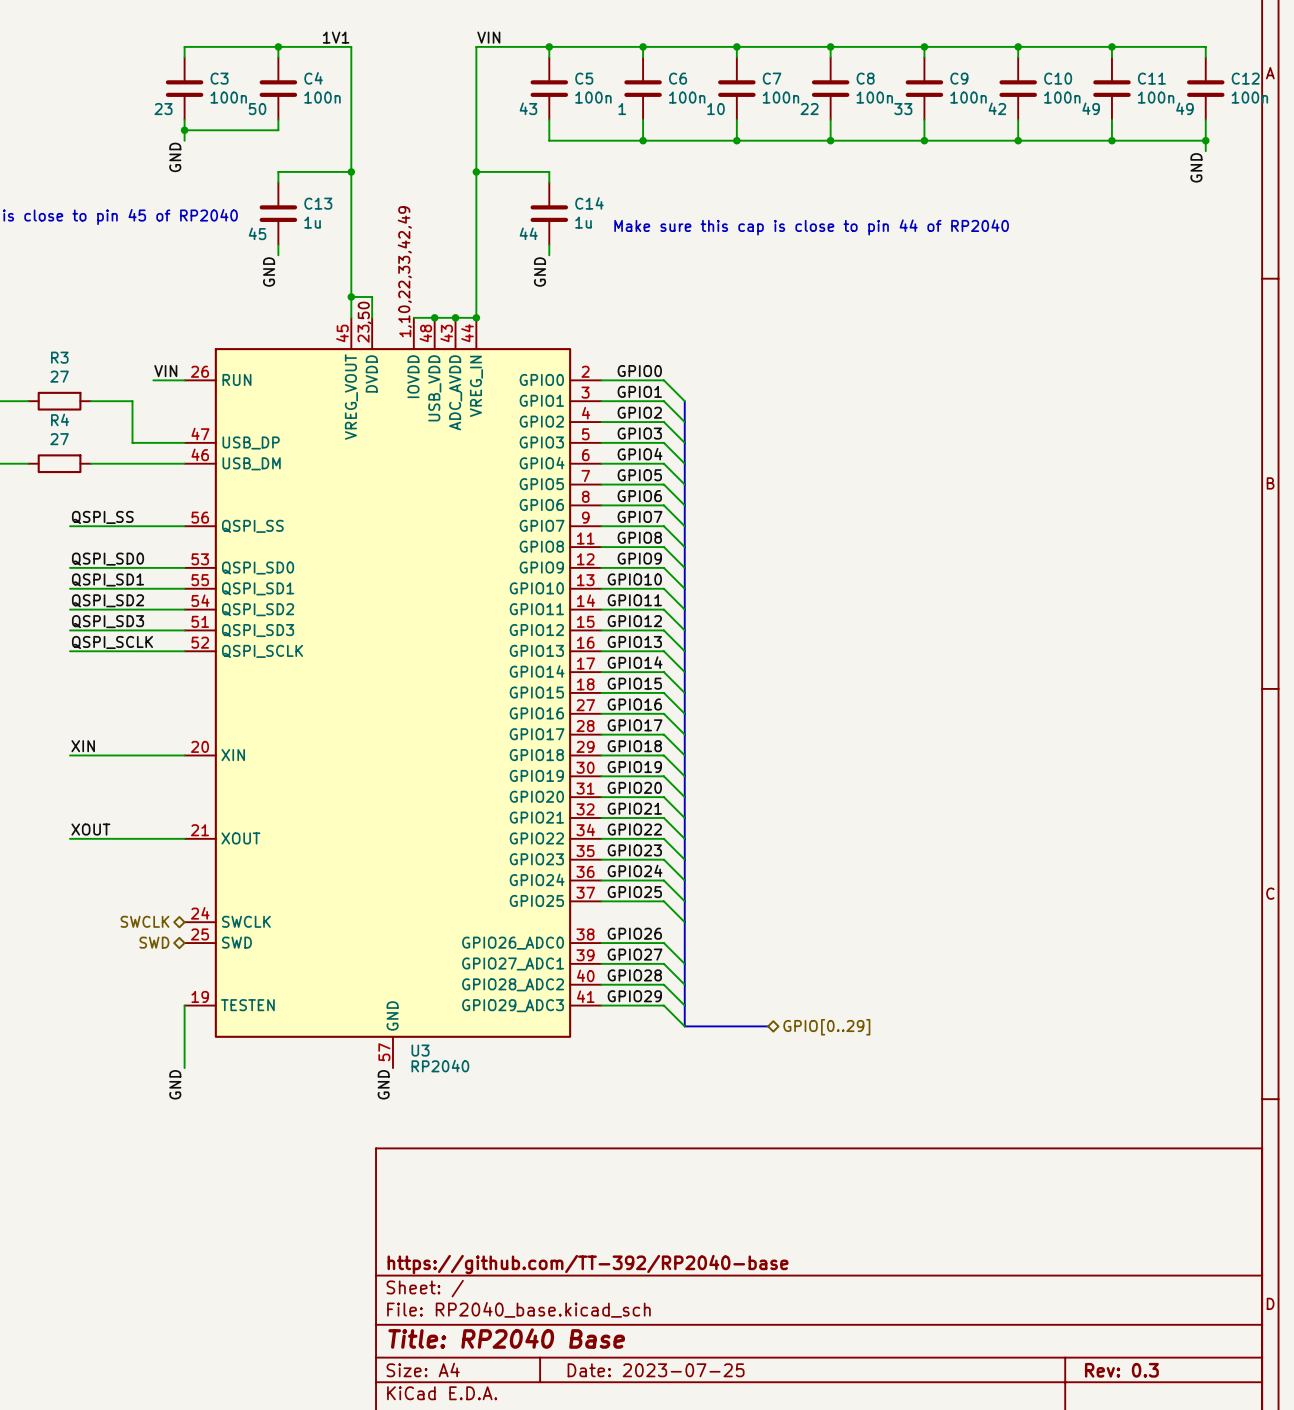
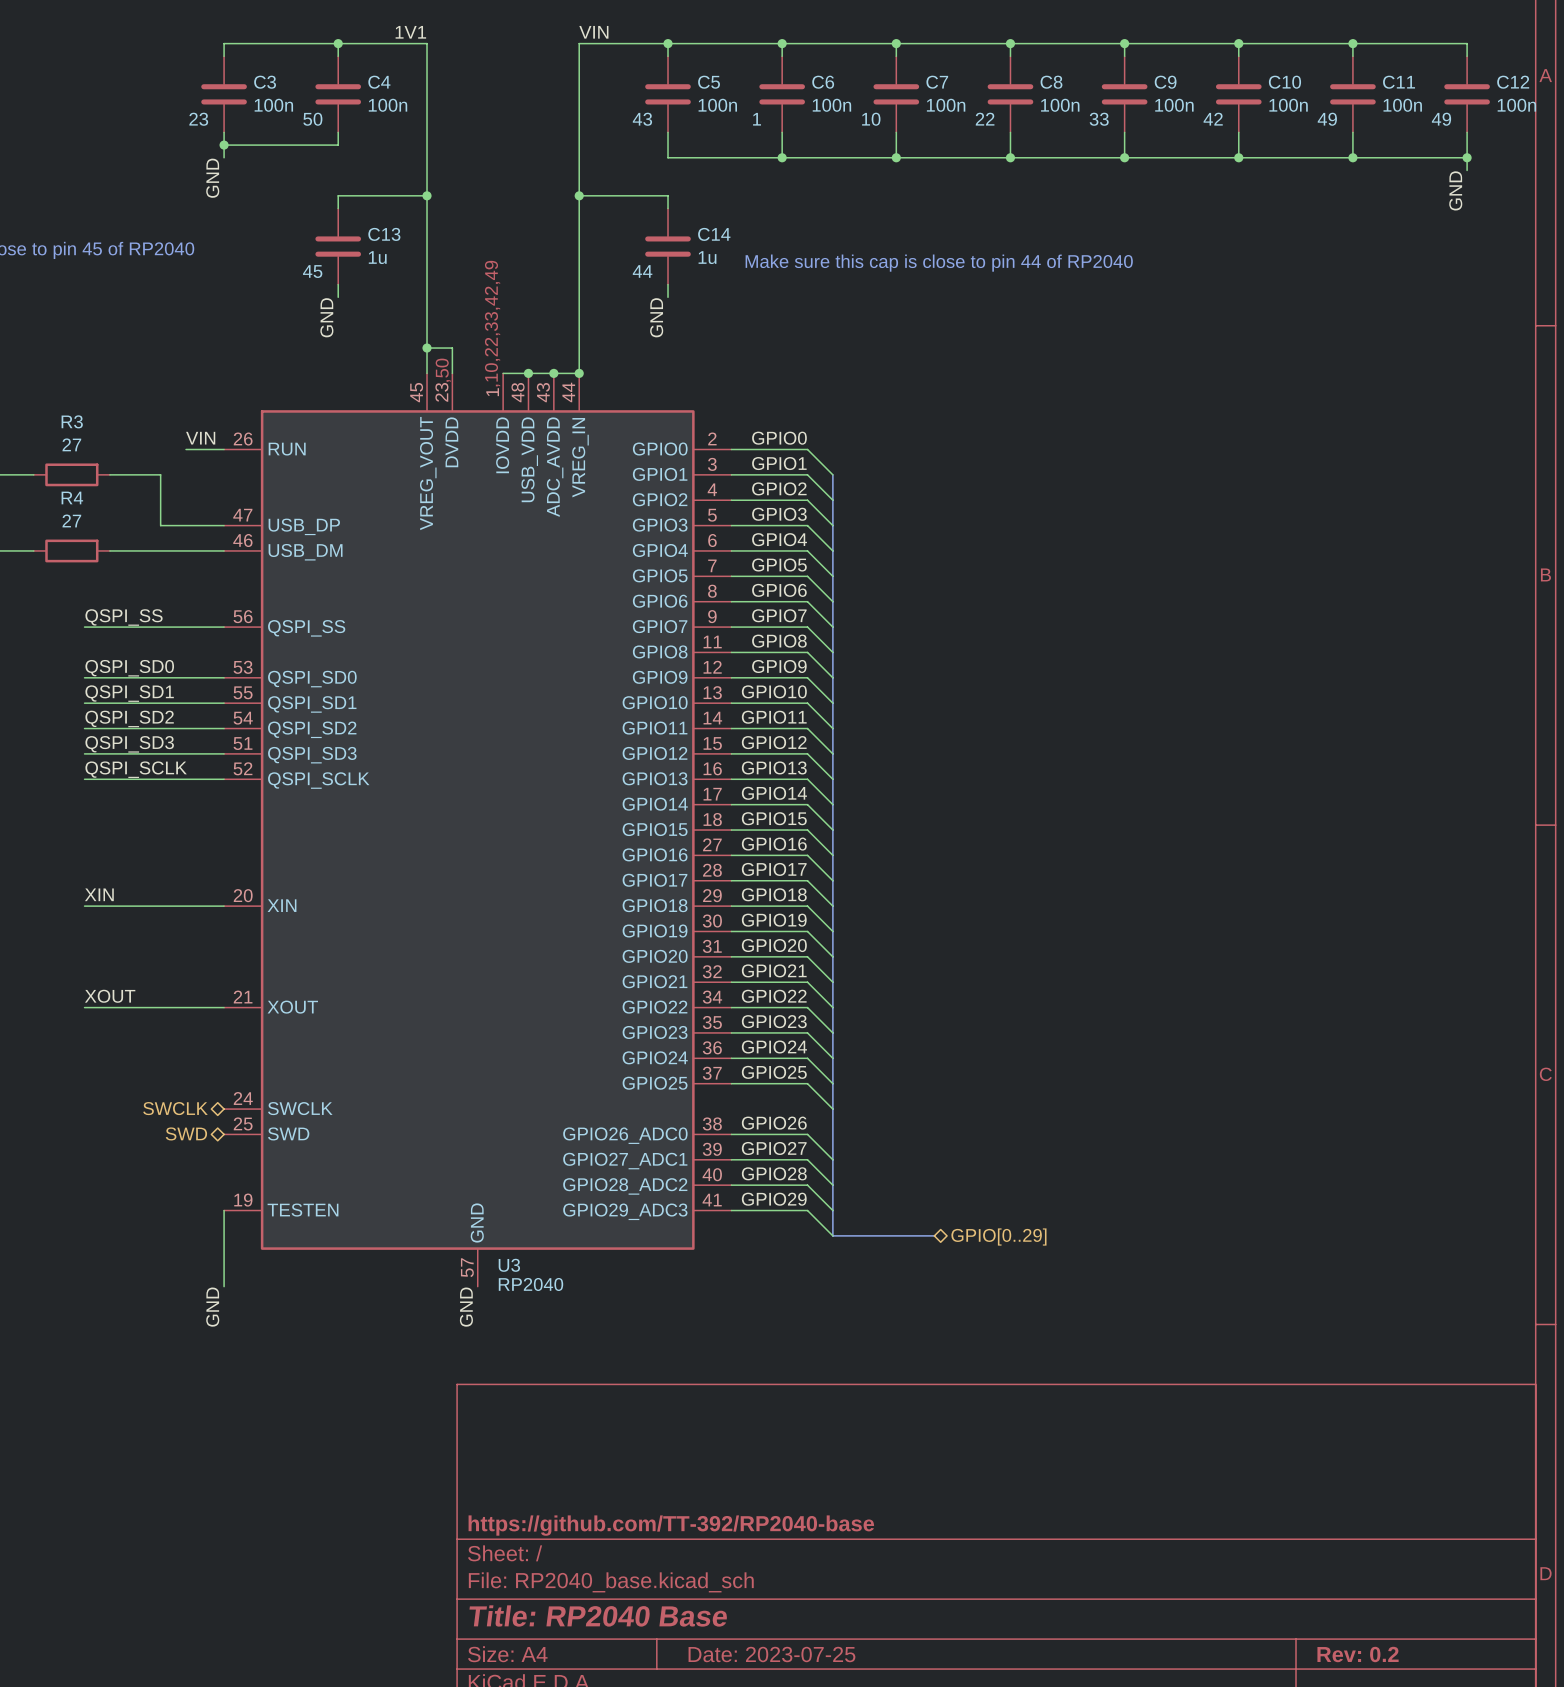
title block: Rev: 0.3 (1121, 1370) -> Rev: 0.2 (1358, 1654)

